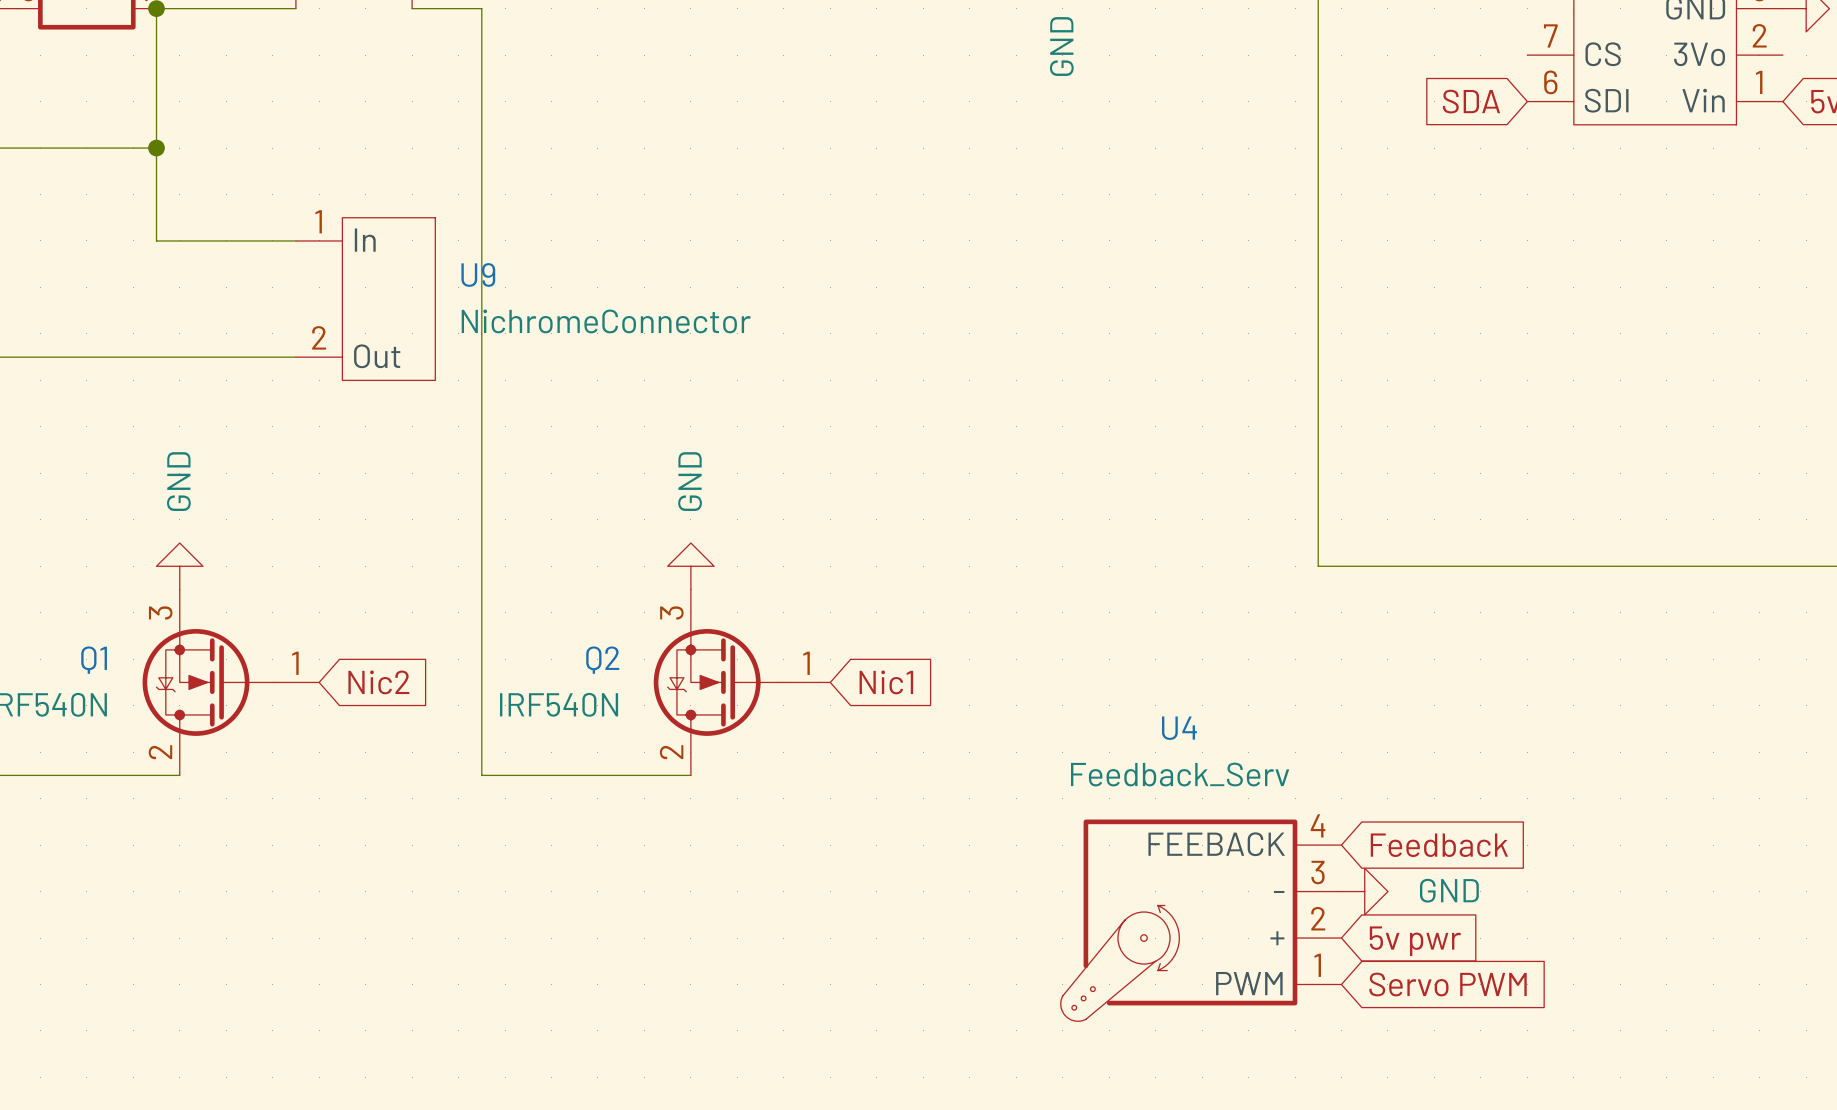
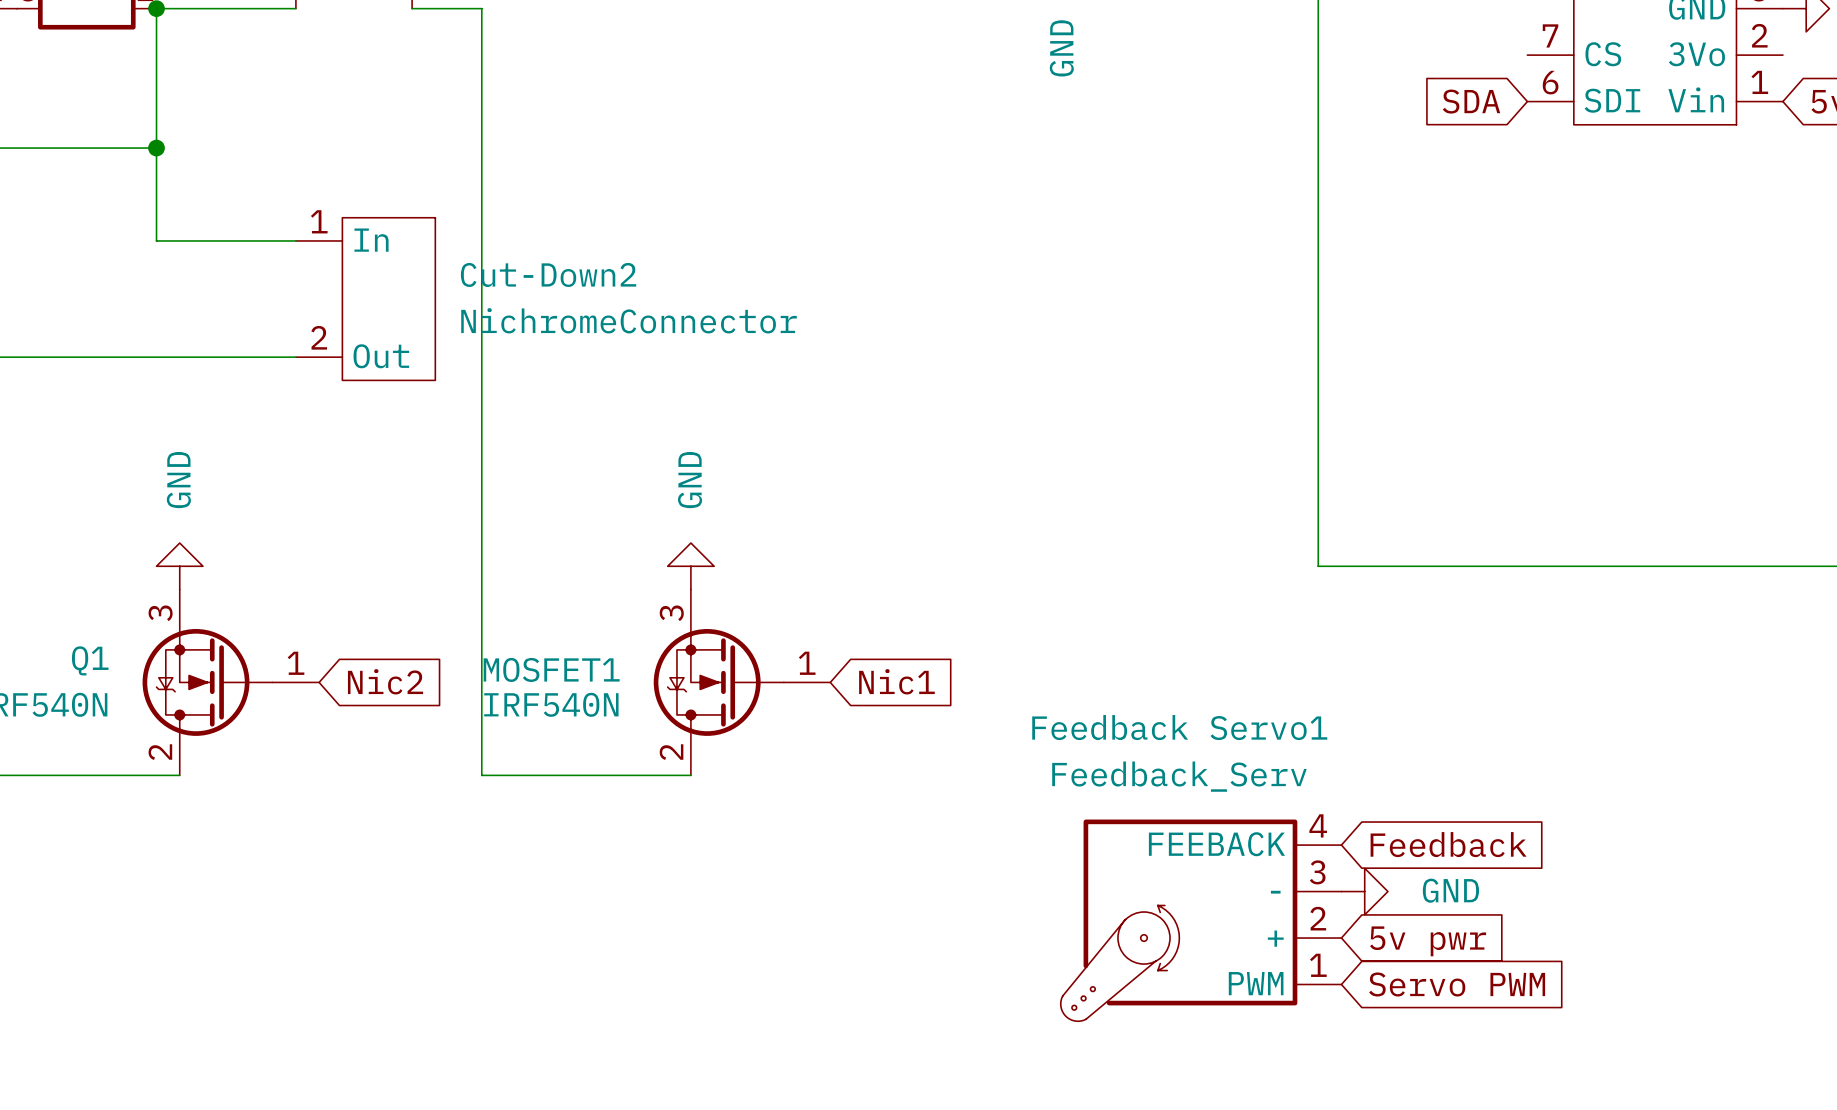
U9 name: U9 (478, 274) -> Cut-Down2 (548, 274)
Q2 name: Q2 (602, 660) -> MOSFET1 (551, 669)
U4 name: U4 (1179, 728) -> Feedback Servo1 (1179, 727)

